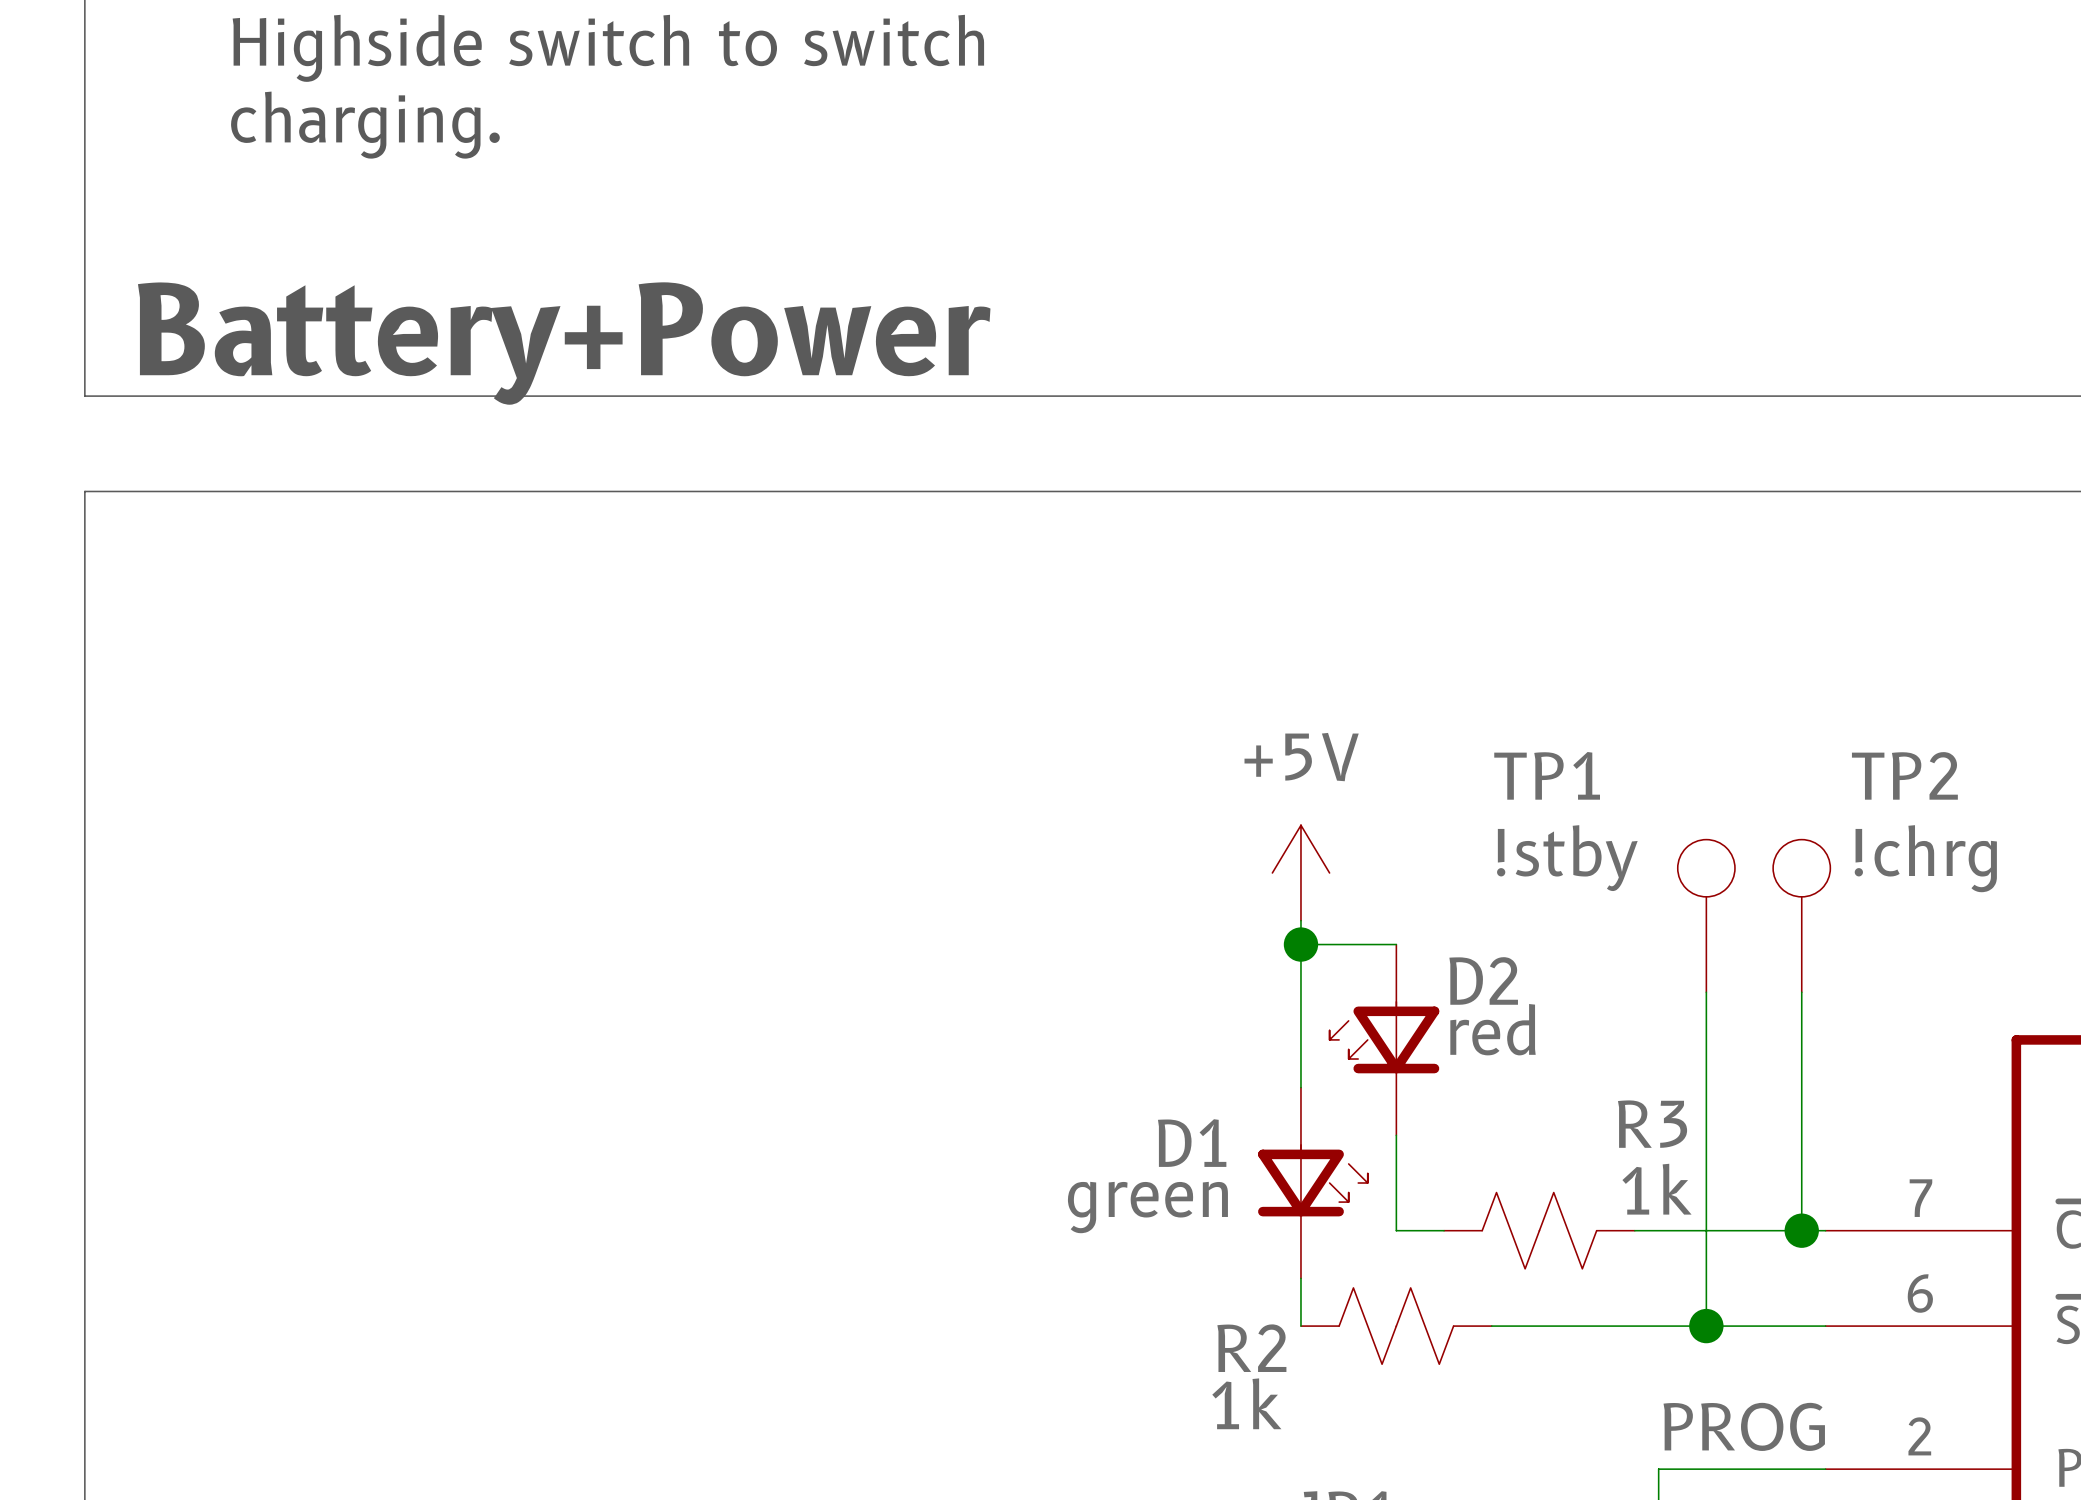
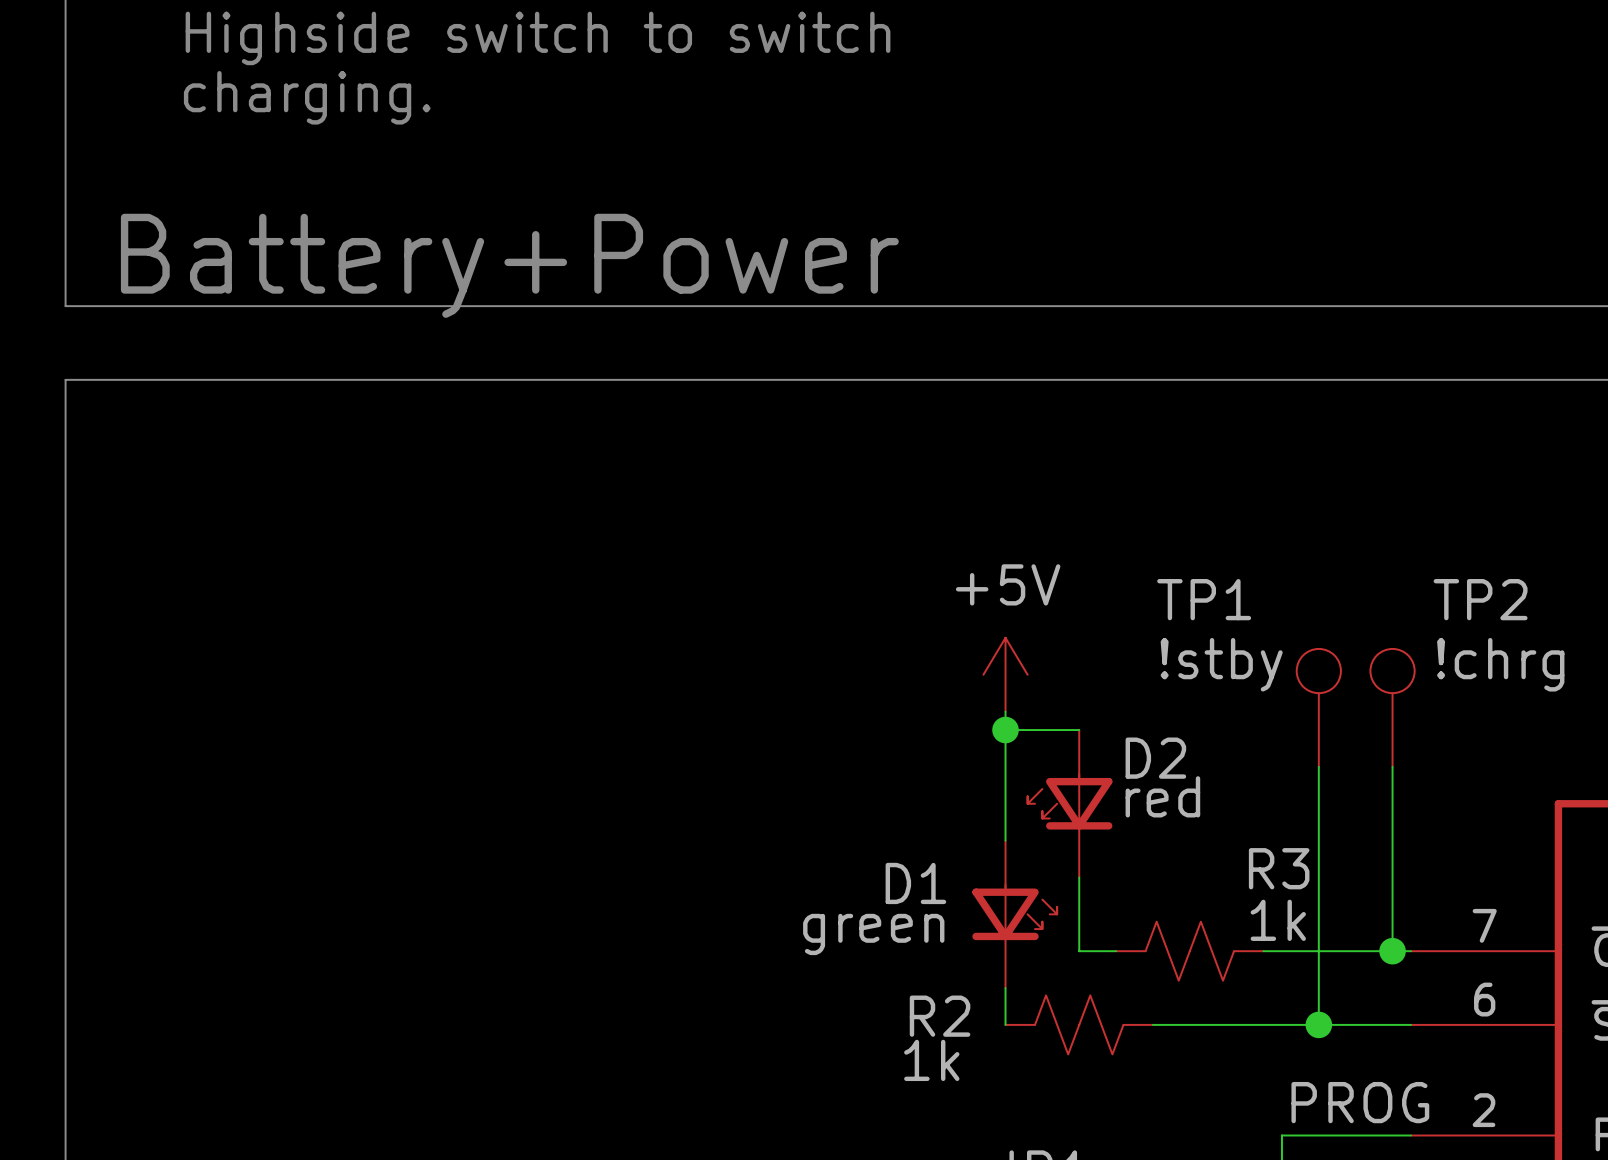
R2 name position: R2 (1251, 1348) -> R2 (940, 1016)
R2 value position: 1k (1246, 1403) -> 1k (931, 1060)

